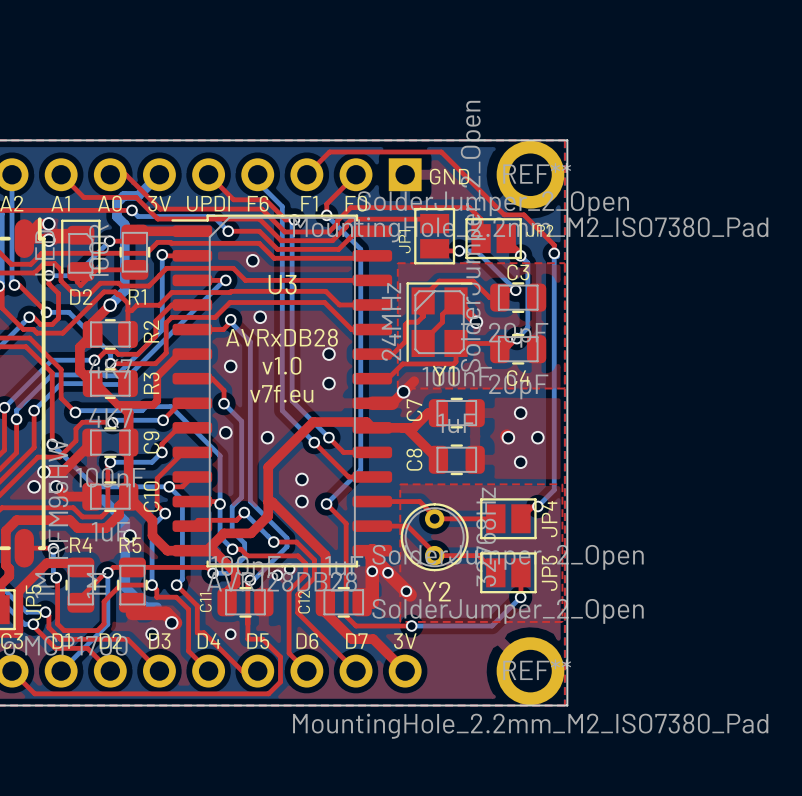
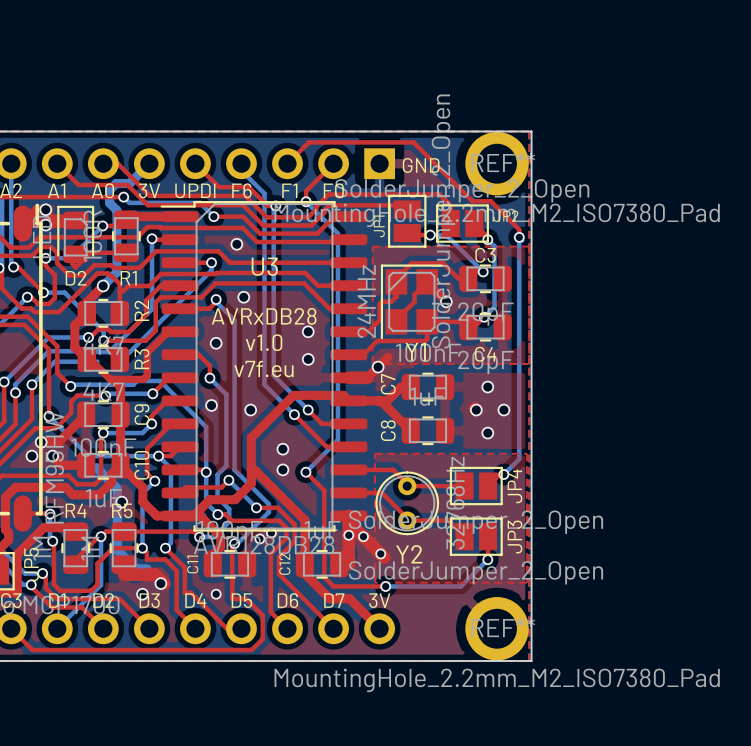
bottom track: (225, 280) (120, 384) (61, 383) (58, 386) -> (97, 361) (55, 361)
bottom track: none -> (211, 265) (211, 270) (120, 361) (115, 361)

